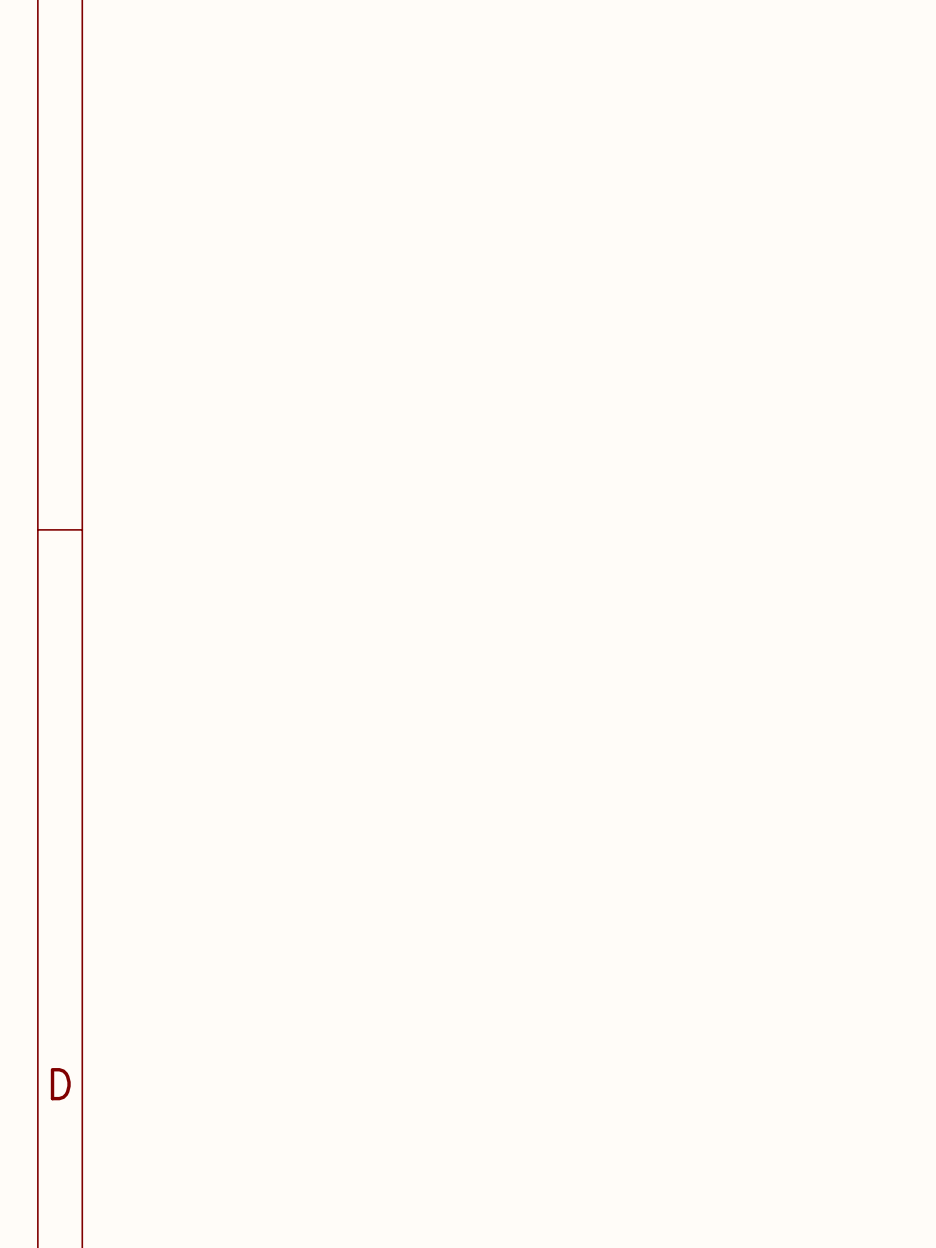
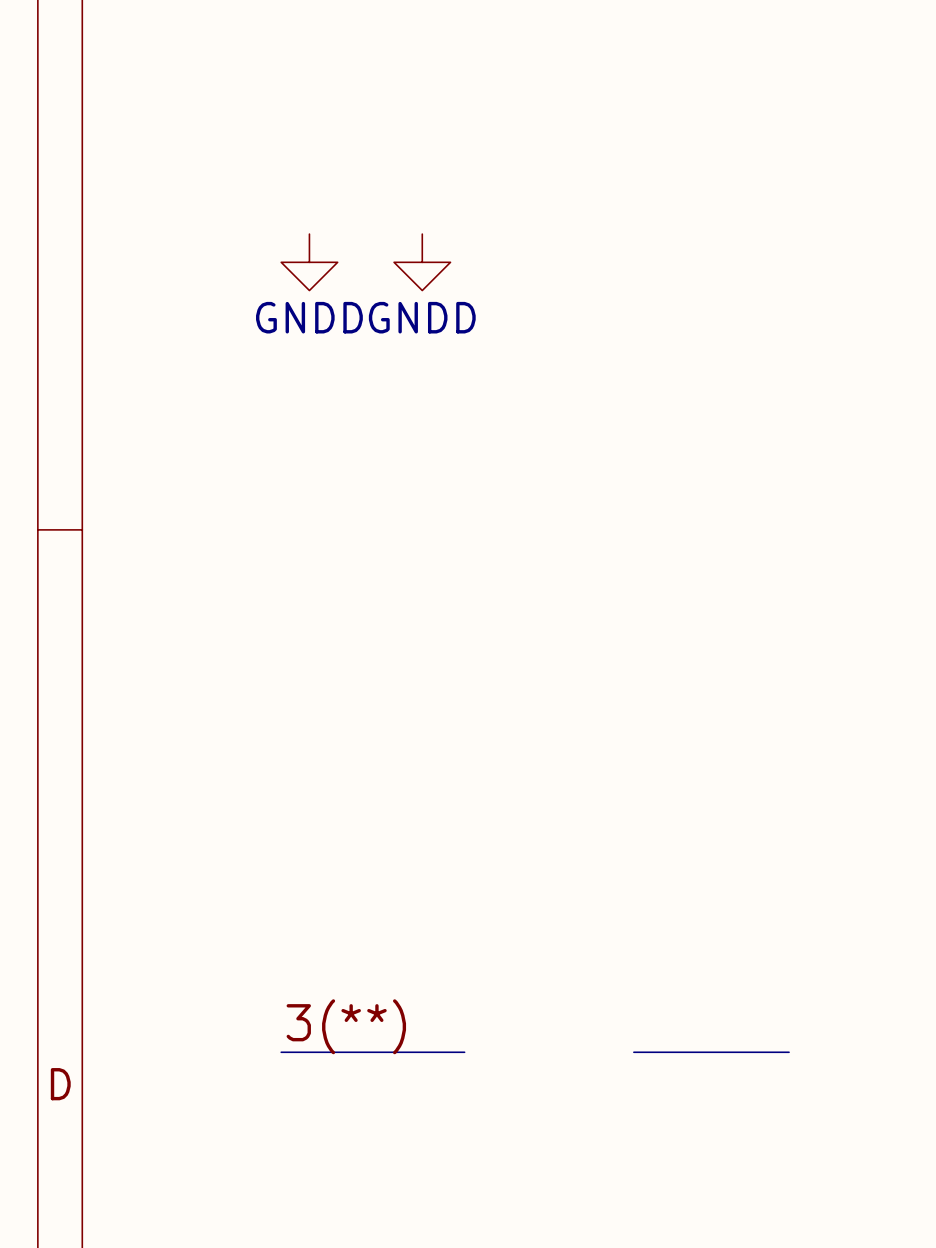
power symbol: none -> GNDD (309, 262)
power symbol: none -> GNDD (422, 262)
label: none -> 3(**) (346, 1026)
wire: none -> (281, 1052) (464, 1052)
wire: none -> (633, 1052) (789, 1052)

